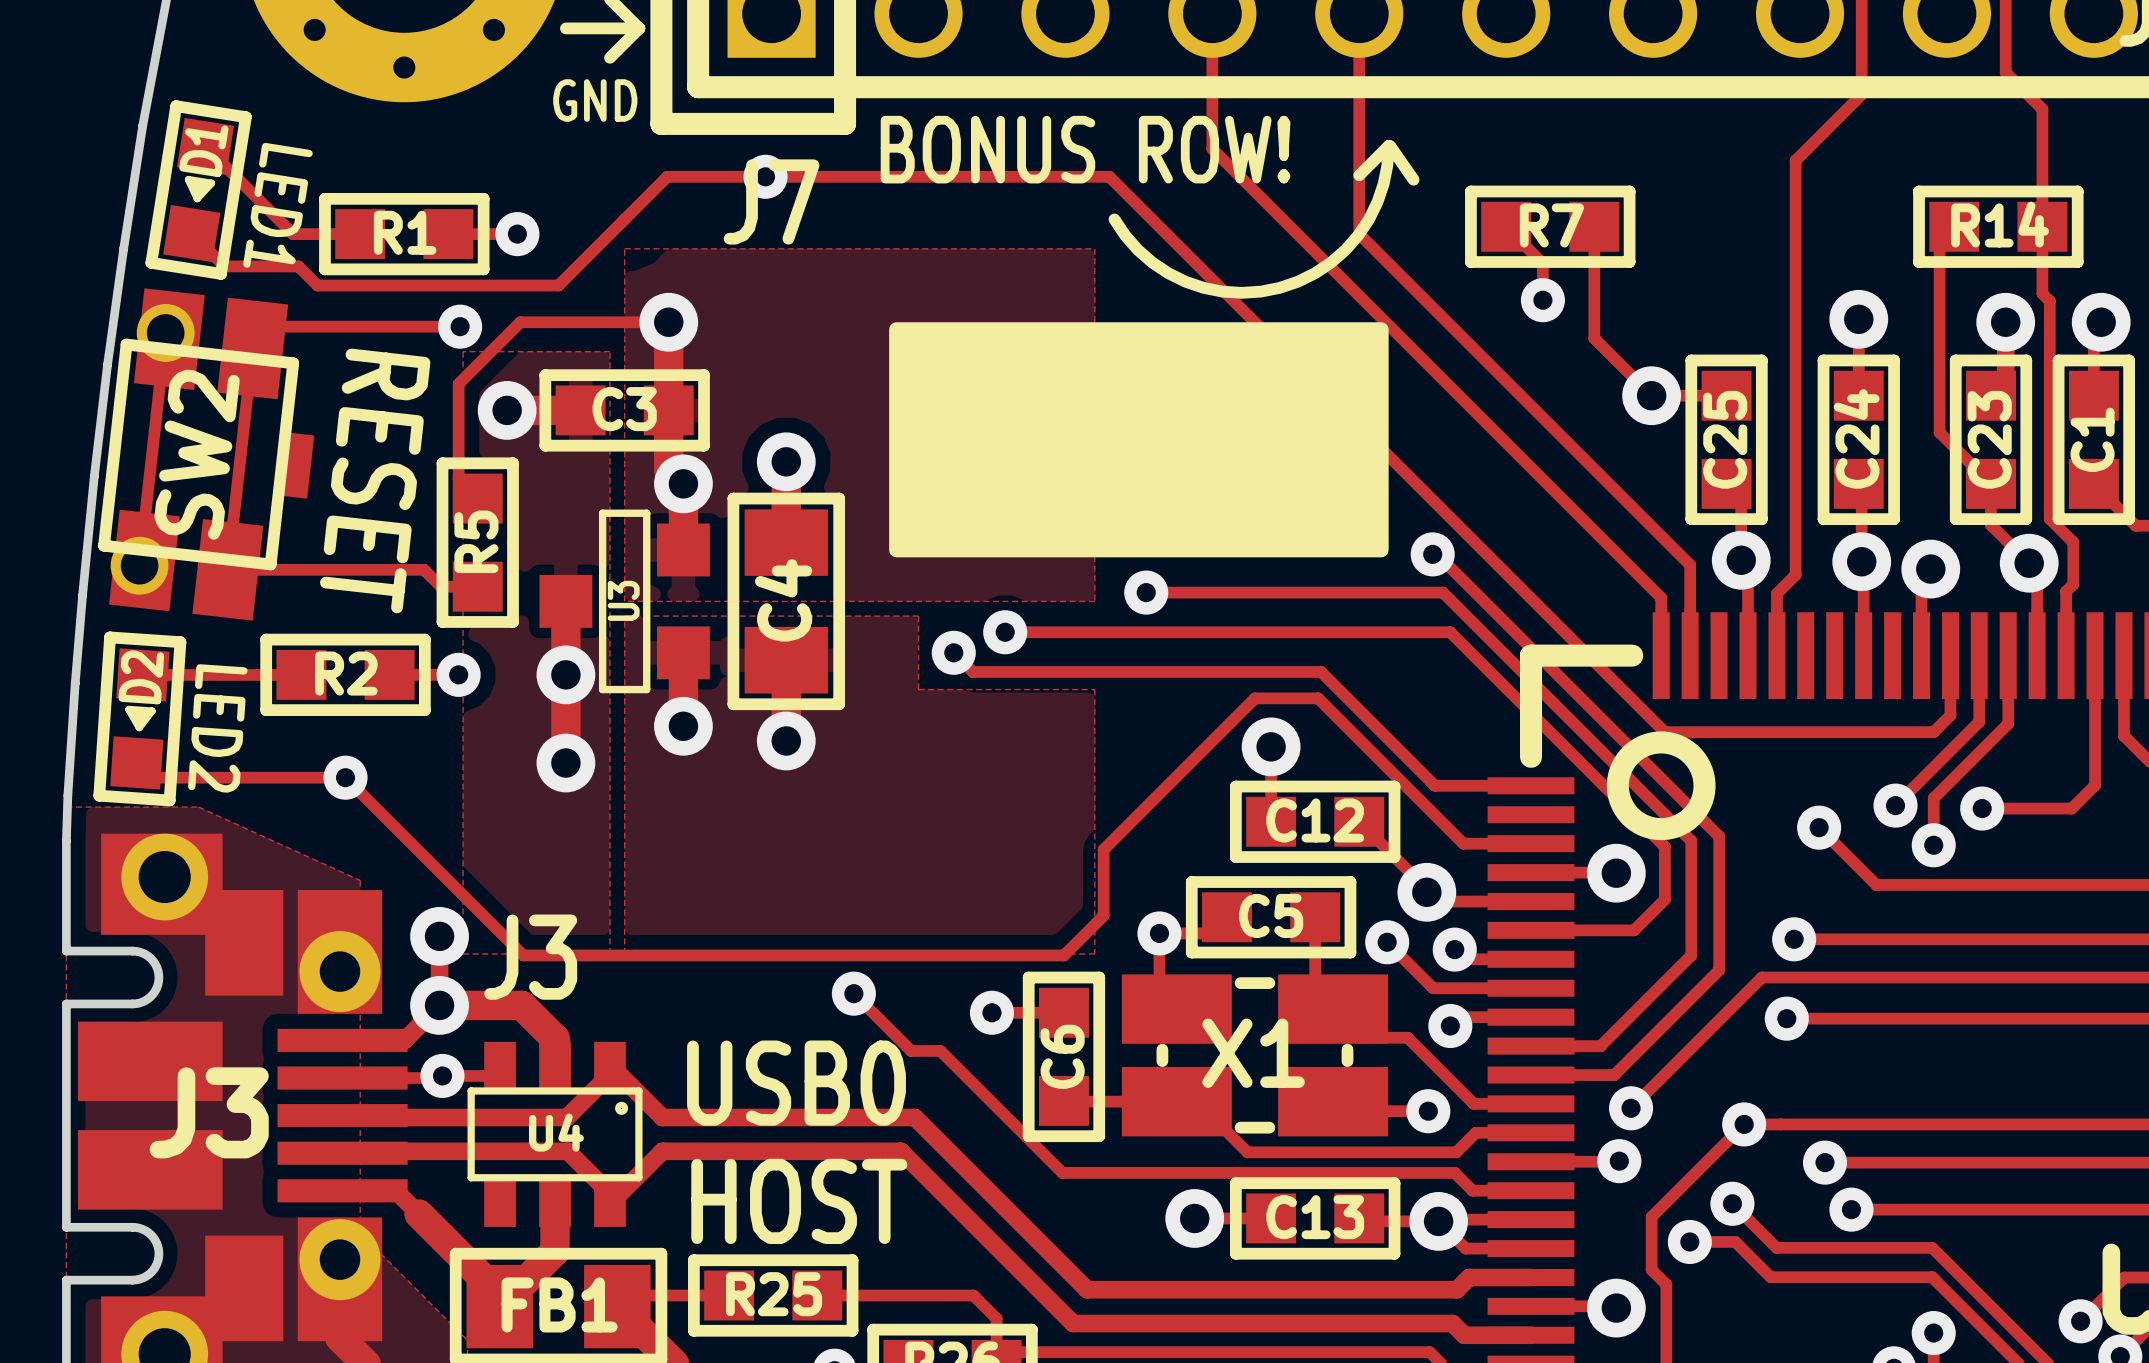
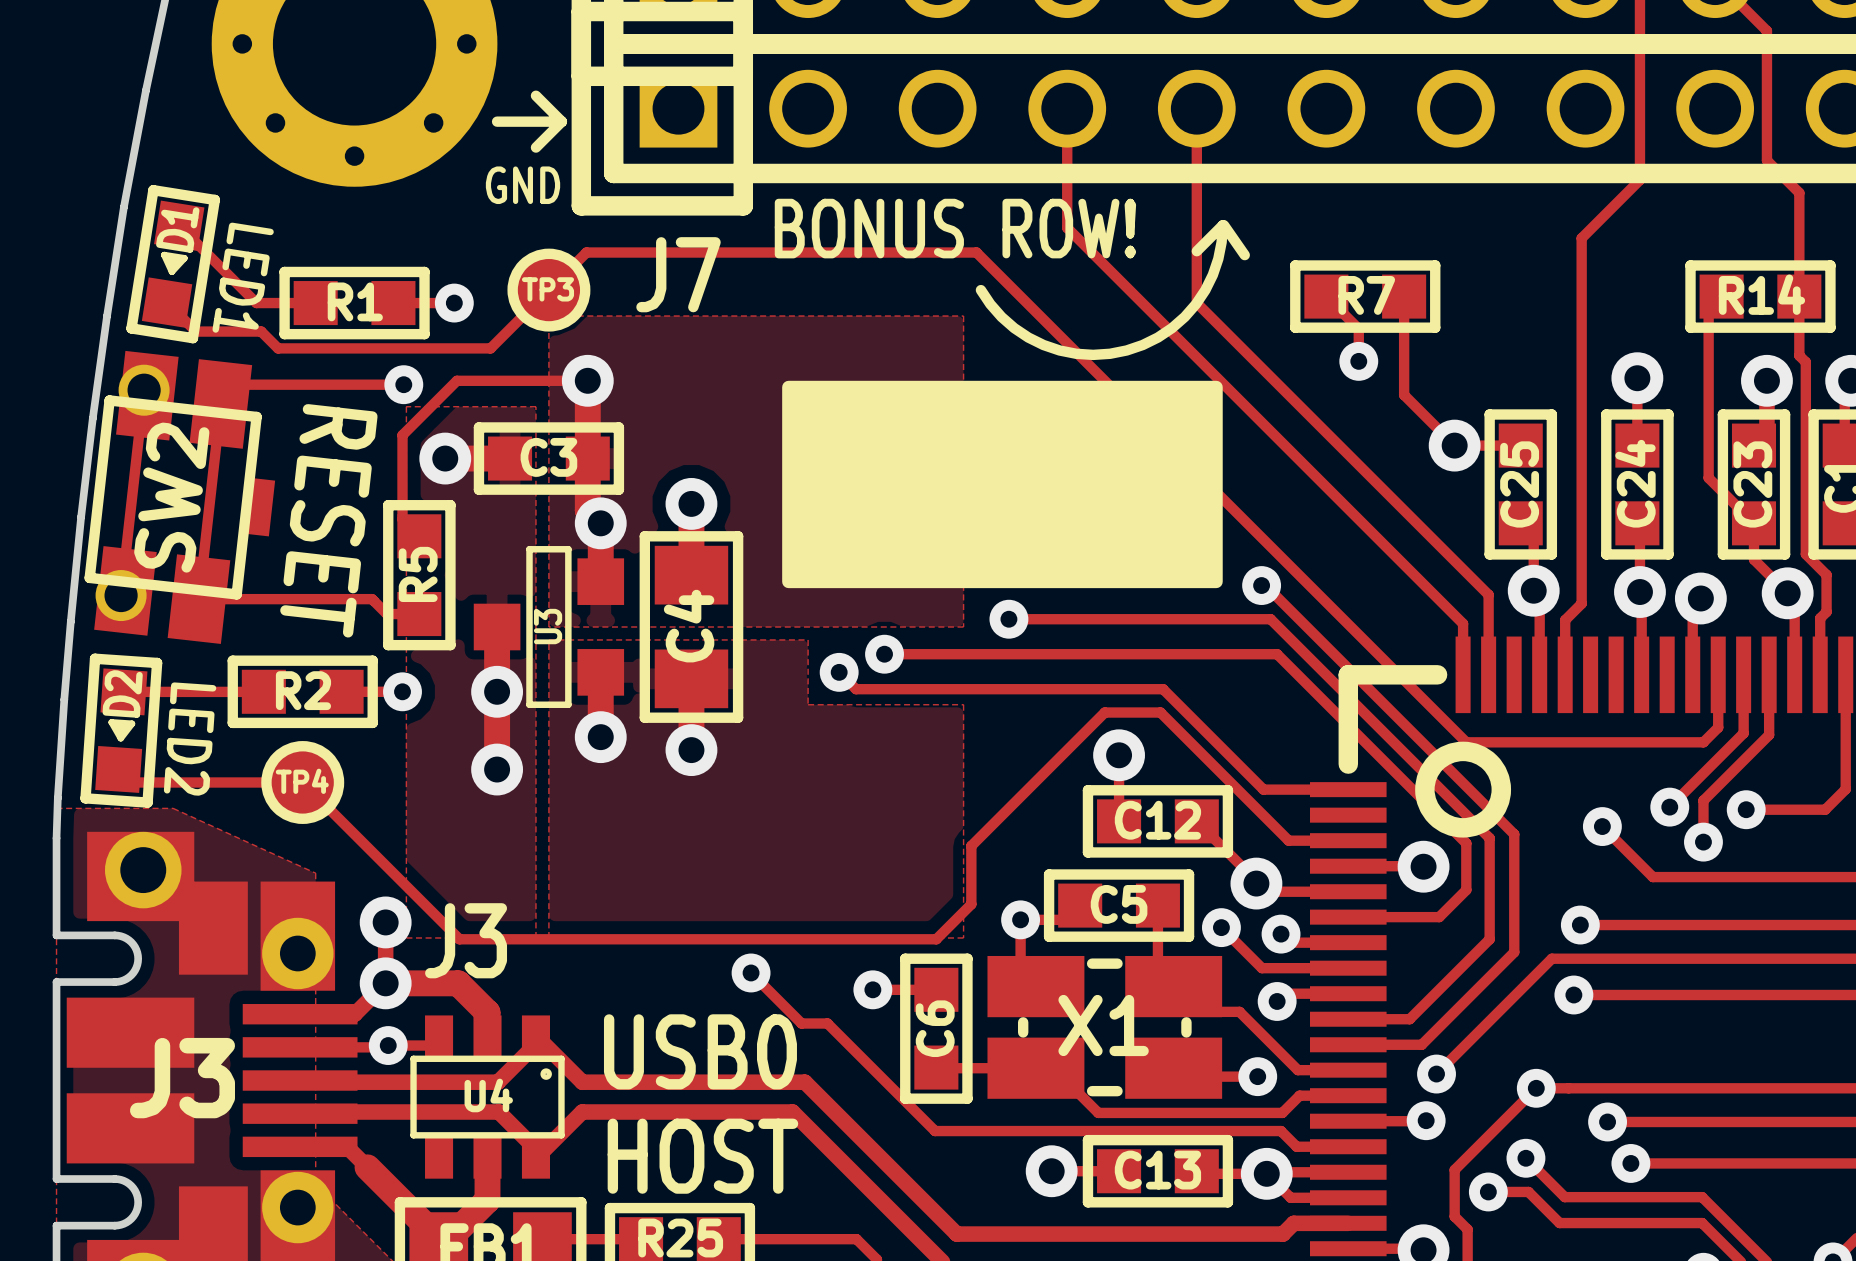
via: (765, 176) -> none
TP3: none -> (548, 290)
via: (345, 777) -> none
TP4: none -> (302, 782)

